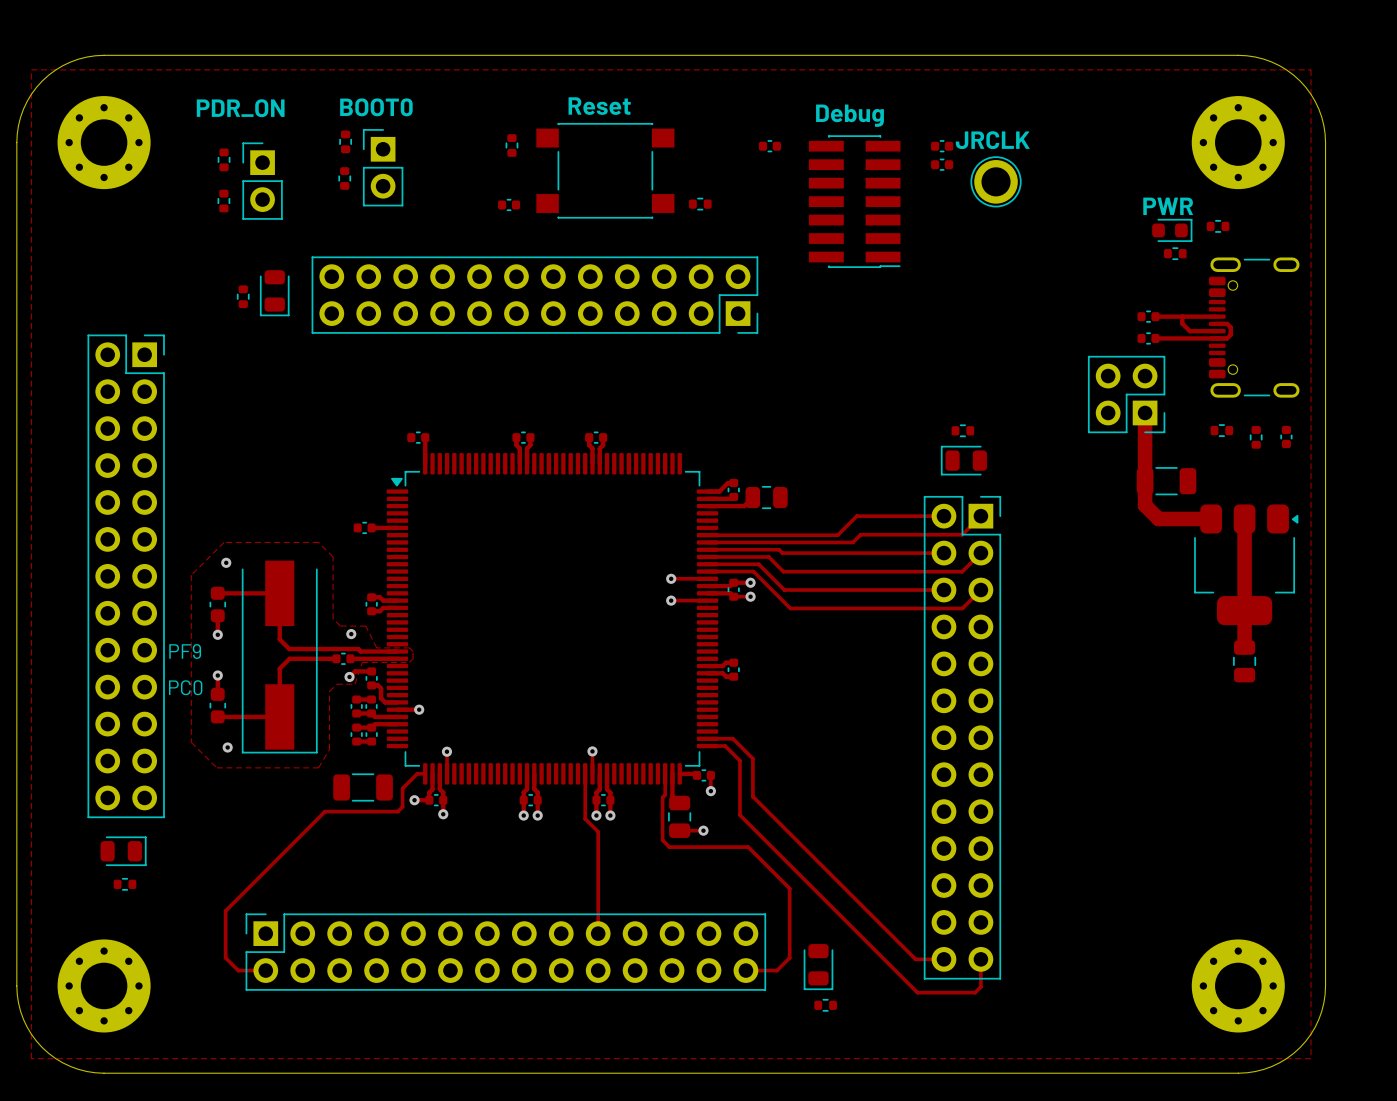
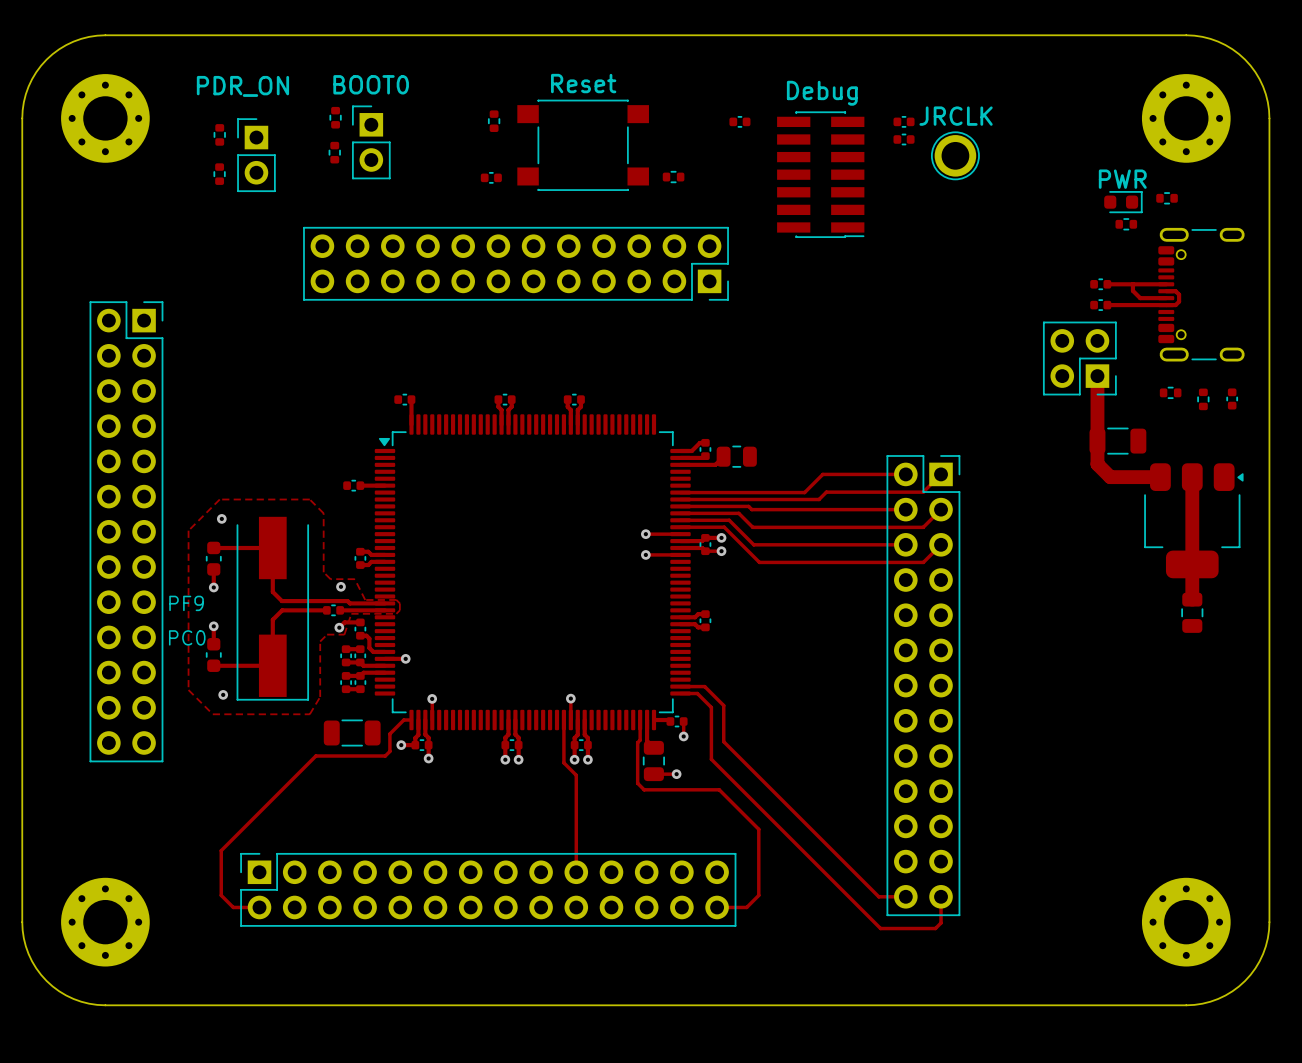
zone outline: (31, 69) (1311, 69) (1311, 1058) (31, 1058) (31, 69) -> none
part: (274, 293) -> none
part: (243, 296) -> none
part: (962, 430) -> none
part: (963, 460) -> none
part: (123, 851) -> none
part: (125, 884) -> none
part: (818, 967) -> none
part: (825, 1005) -> none

